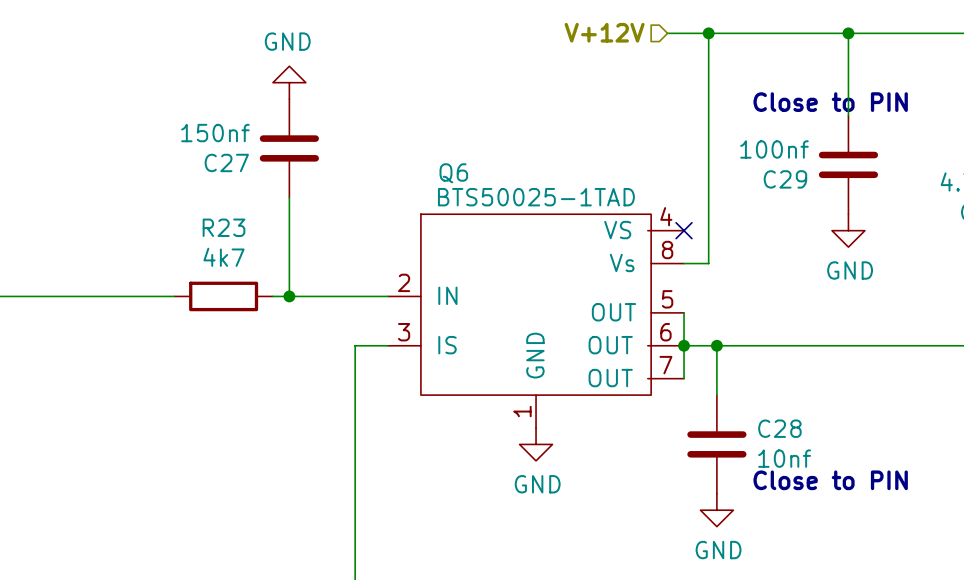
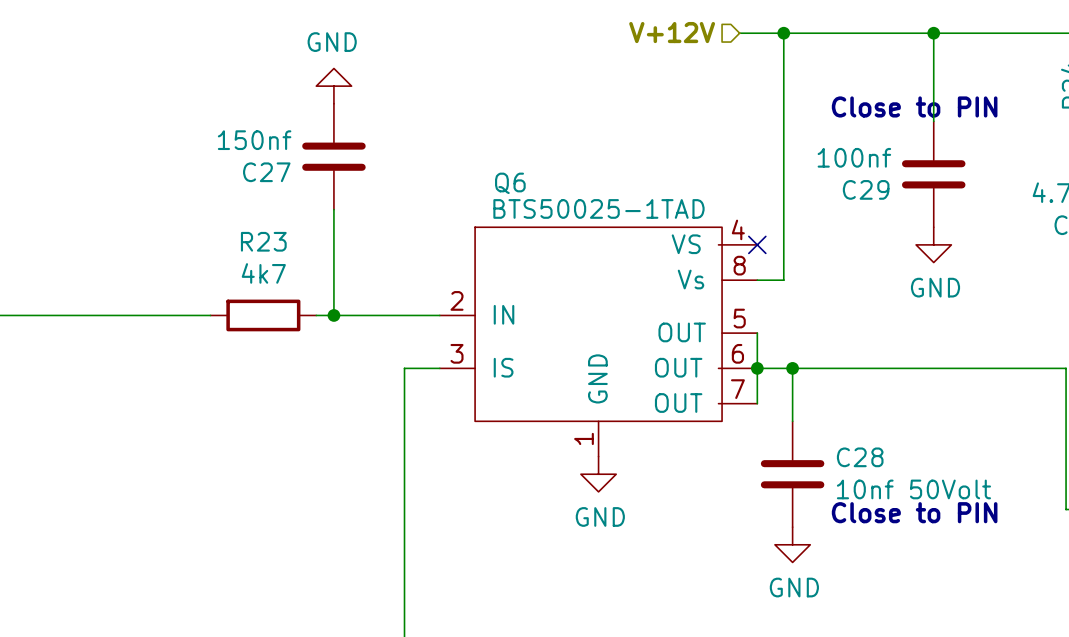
C28 value: 10nf (784, 458) -> 10nf 50Volt (913, 489)

